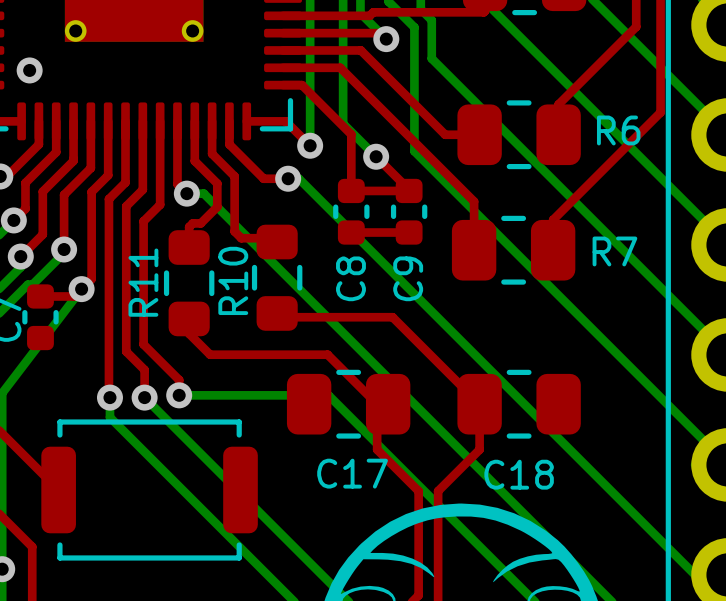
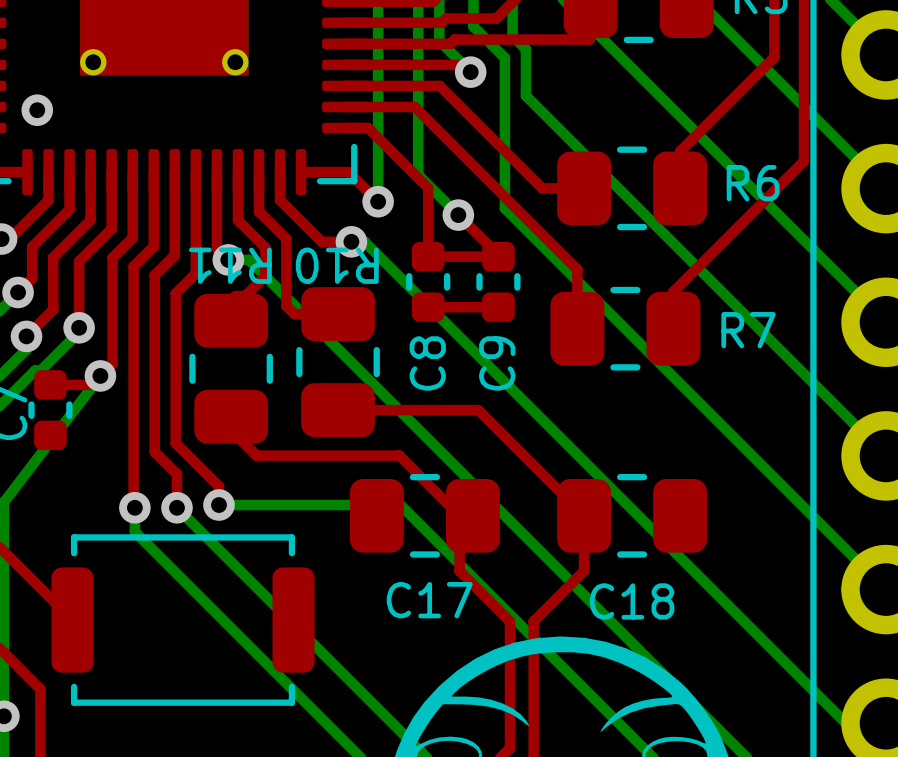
R10 footprint: [251, 224, 303, 331] -> [296, 287, 380, 438]
R11 footprint: [163, 230, 215, 337] -> [189, 293, 273, 444]
R10 name rotation: 0° (233, 280) -> 90° counterclockwise (337, 265)
R10 name position: R10 (233, 280) -> R10 (337, 265)
R11 name rotation: 0° (143, 282) -> 90° counterclockwise (230, 265)
R11 name position: R11 (143, 282) -> R11 (230, 265)

